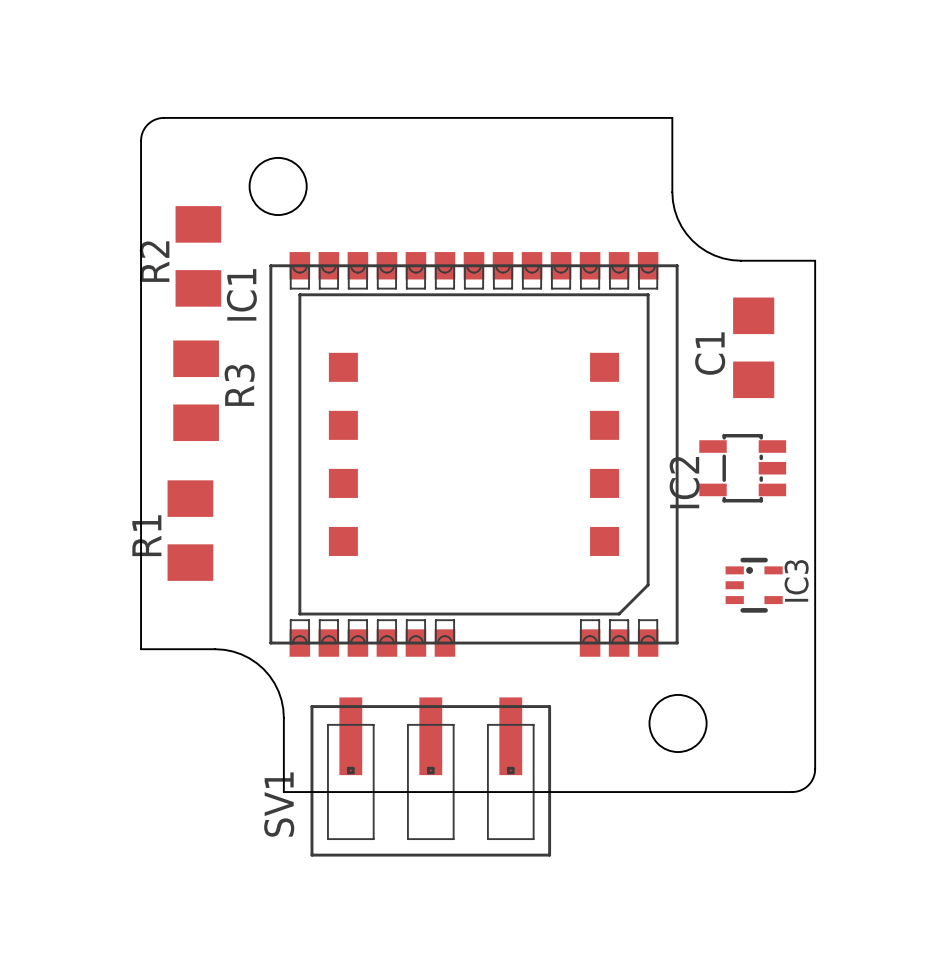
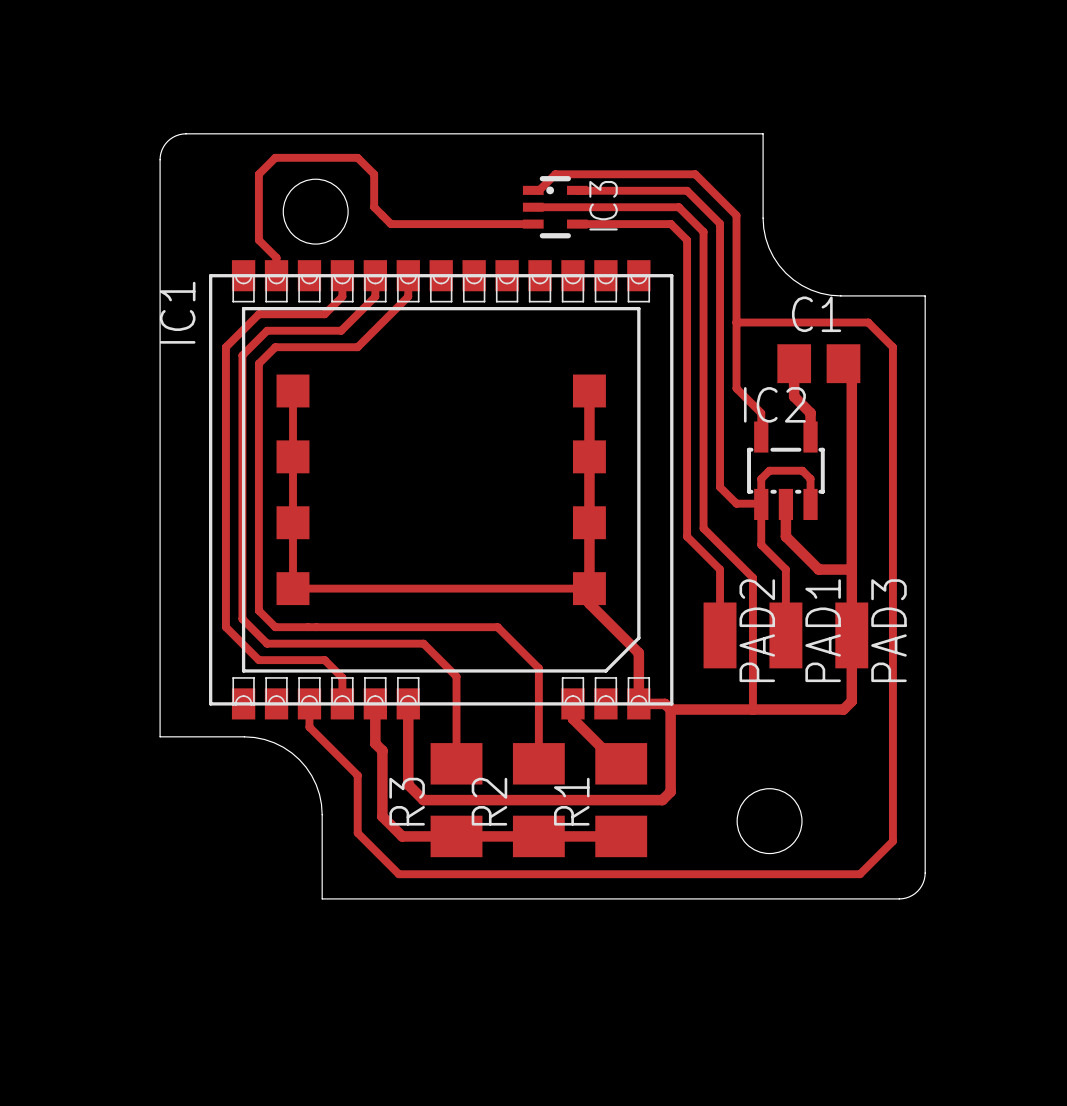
track: none -> (533, 190) (539, 190) (555, 174) (695, 174) (736, 215) (736, 388) (761, 413) (761, 437)
track: none -> (577, 190) (687, 190) (720, 223) (720, 487) (736, 503) (761, 504)
track: none -> (533, 207) (678, 207) (703, 231) (703, 528) (752, 577) (752, 709)
track: none -> (533, 224) (391, 224) (374, 207) (374, 174) (357, 157) (275, 157) (258, 174) (258, 240) (276, 257) (276, 275)
track: none -> (577, 224) (671, 224) (687, 240) (687, 536) (720, 569) (720, 635)
track: none -> (342, 275) (342, 296) (324, 314) (258, 314) (225, 347) (225, 627) (258, 660) (324, 660) (342, 677) (342, 703)
track: none -> (375, 275) (375, 296) (341, 330) (267, 330) (242, 355) (242, 618) (267, 643) (423, 643) (456, 676) (456, 763)
track: none -> (408, 275) (408, 296) (357, 347) (275, 347) (258, 363) (258, 610) (275, 627) (497, 627) (538, 668) (538, 763)
R2 position: (198, 256) -> (538, 800)
track: none -> (736, 322) (868, 322) (892, 347) (892, 841) (860, 874) (398, 874) (357, 833) (357, 775) (309, 727) (309, 703)
C1 footprint: [733, 297, 775, 399] -> [777, 344, 861, 384]
track: none -> (794, 363) (794, 396) (810, 413) (810, 437)
track: none -> (843, 363) (851, 371) (851, 701) (843, 709) (670, 709)
track: none -> (293, 390) (293, 588) (575, 588) (589, 602)
track: none -> (589, 390) (589, 603) (638, 653) (638, 703) (664, 703) (670, 709)
C1 name position: C1 (710, 353) -> C1 (816, 314)
R3 name position: R3 (239, 385) -> R3 (407, 801)
R3 position: (196, 390) -> (456, 800)
track: none -> (785, 504) (785, 536) (818, 569) (851, 569)
track: none -> (810, 504) (810, 478) (802, 470) (769, 470) (761, 478) (761, 544) (785, 569) (785, 635)
IC1 position: (473, 454) -> (441, 489)
IC2 rotation: 0° (742, 468) -> 90° clockwise (785, 470)
IC2 position: (742, 468) -> (785, 470)
R1 position: (190, 530) -> (621, 800)
PAD2: none -> (720, 635)
PAD1: none -> (785, 635)
PAD3: none -> (851, 635)
IC3 position: (754, 585) -> (555, 207)
track: none -> (375, 703) (375, 743) (382, 750) (382, 816) (402, 836) (621, 836)
track: none -> (408, 703) (408, 784) (423, 800) (662, 800) (670, 791) (670, 709)
track: none -> (572, 703) (572, 718) (617, 763) (621, 763)
SV1: (430, 776) -> none

